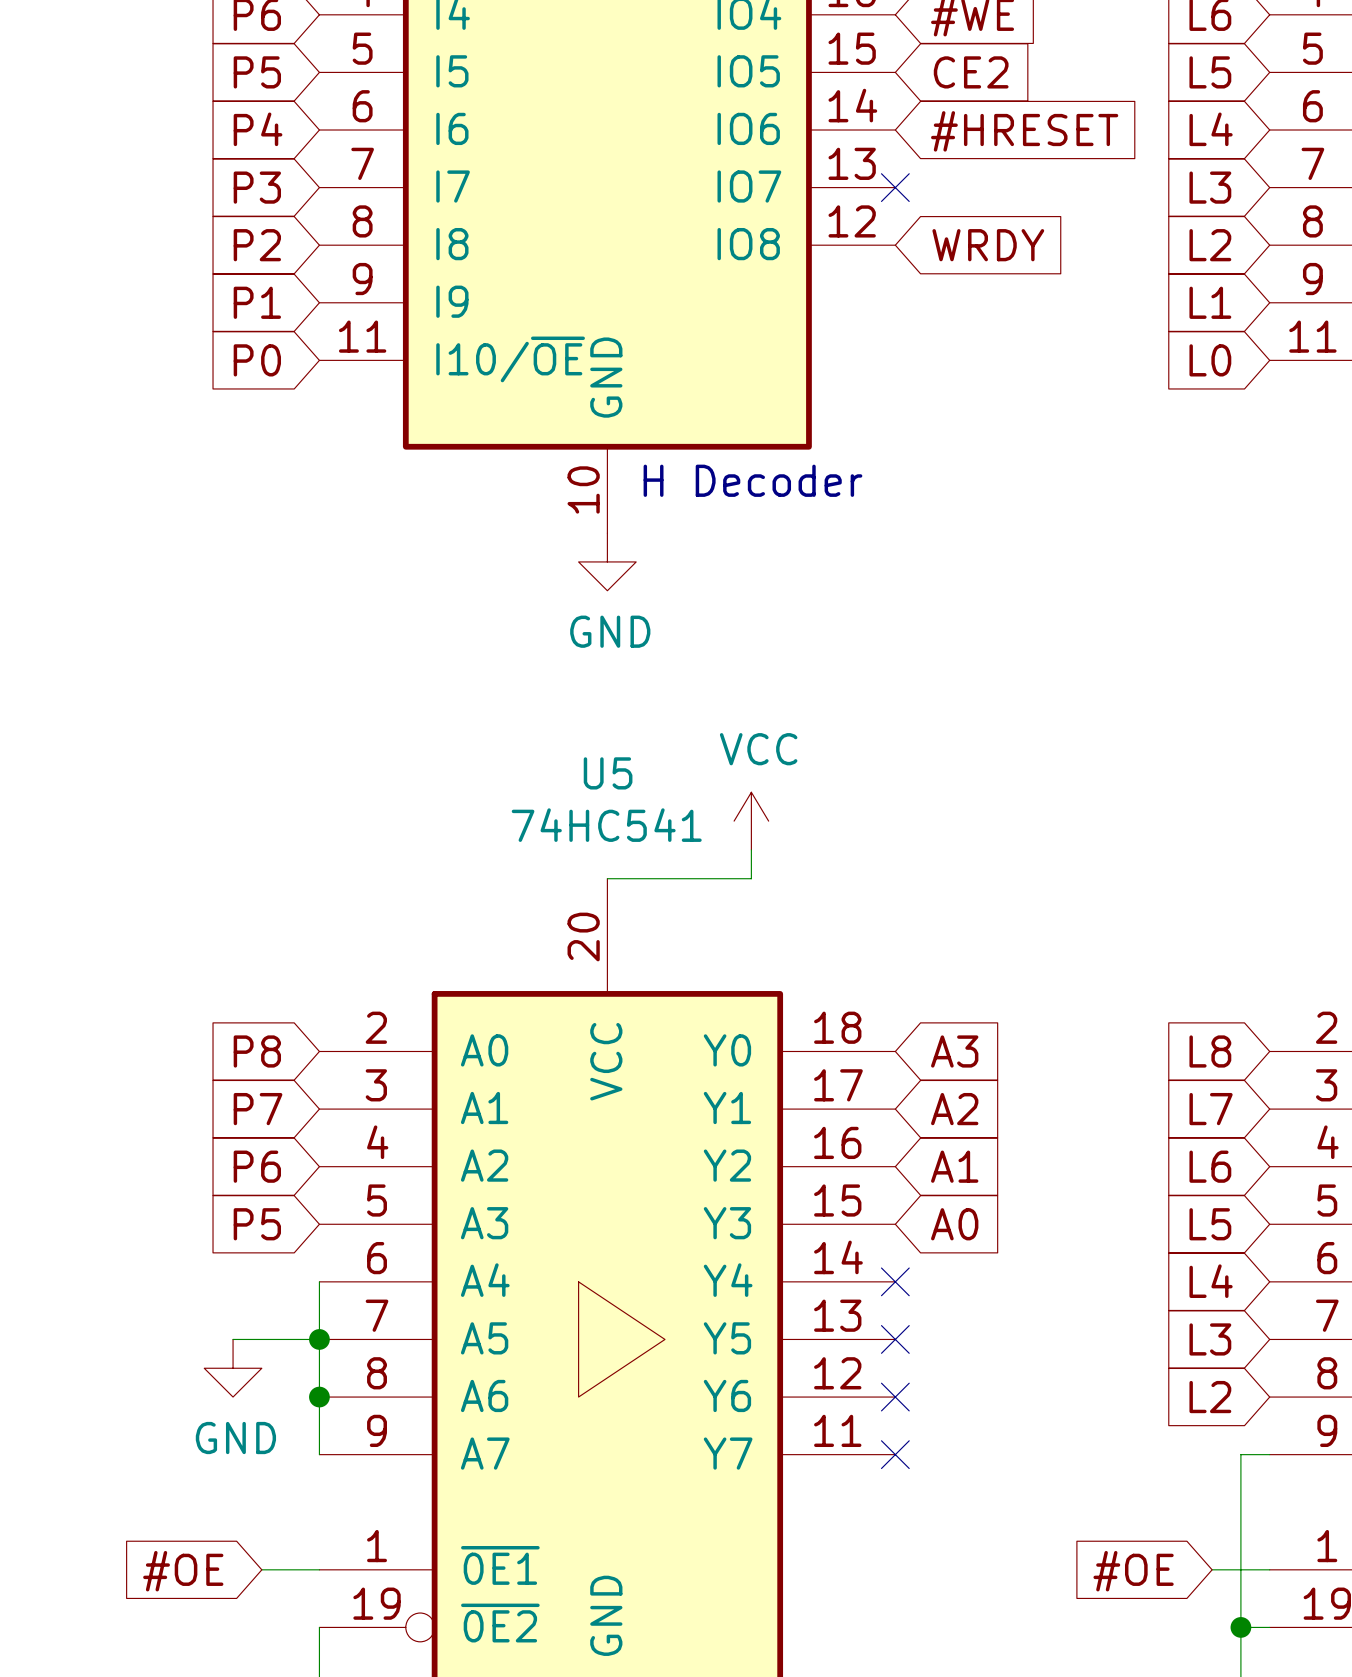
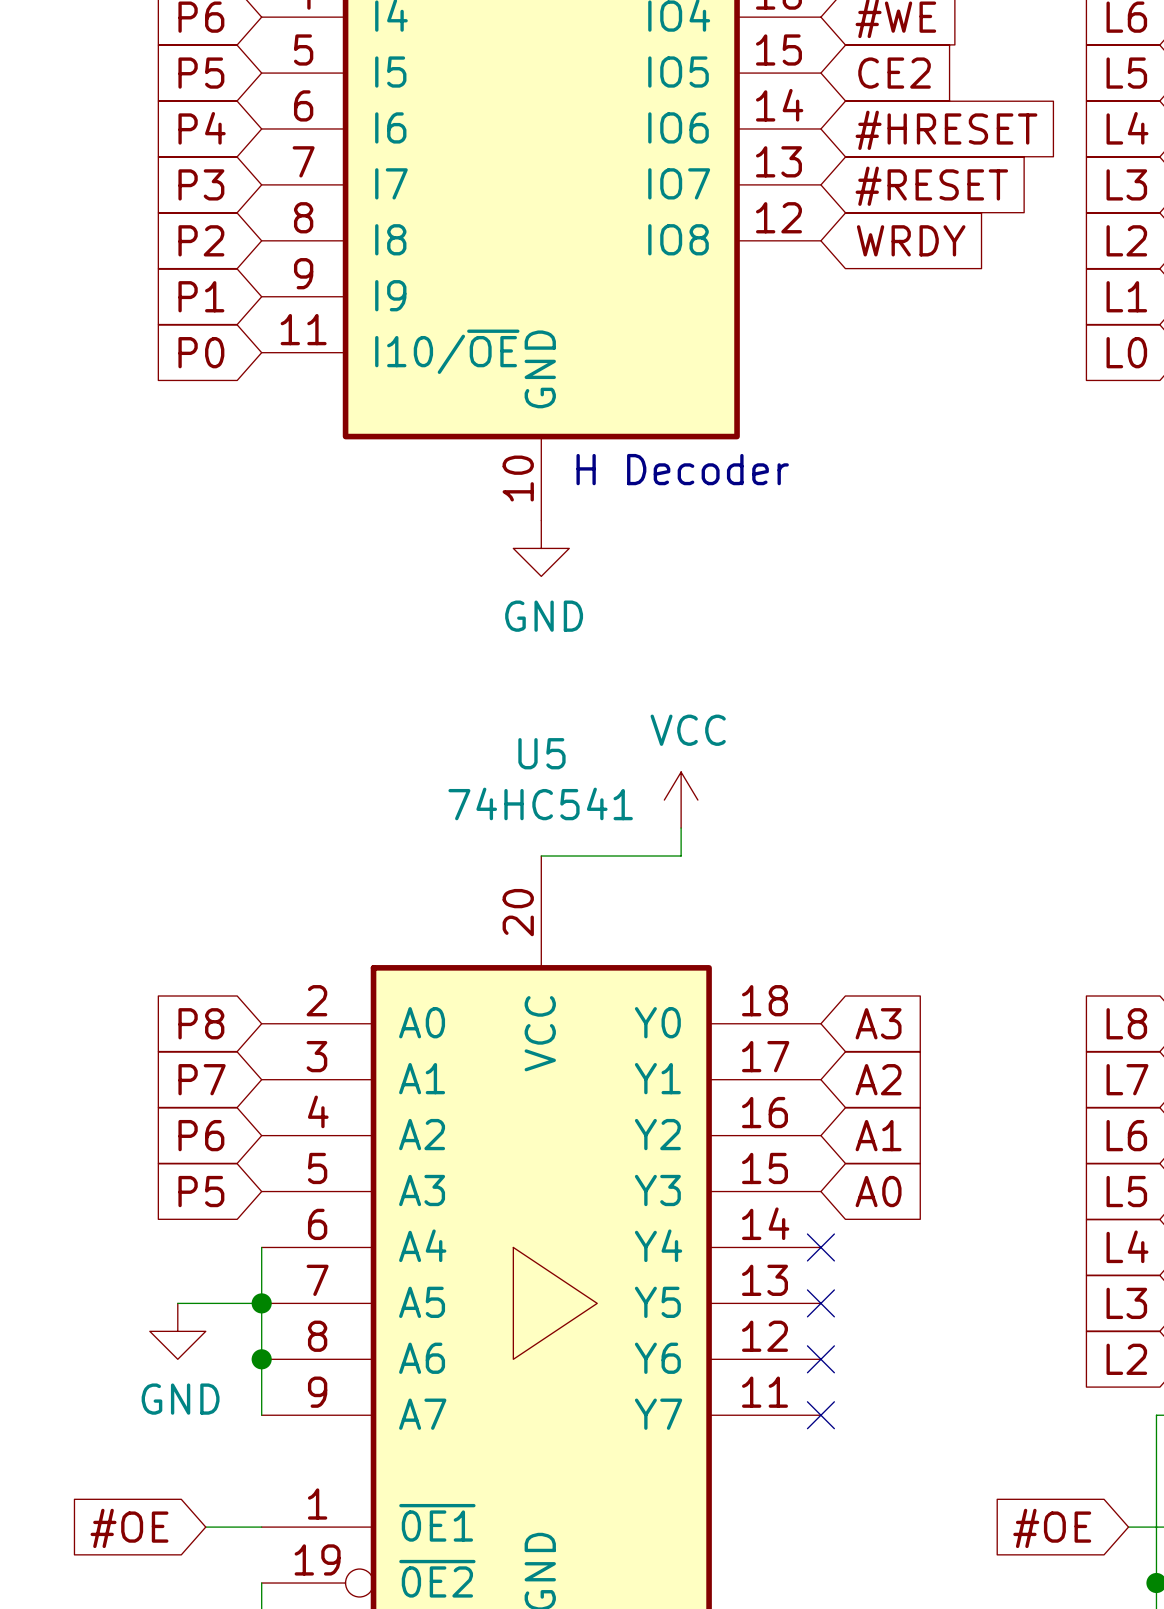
no-connect mark: (895, 187) -> none
global label: none -> #RESET (931, 186)

